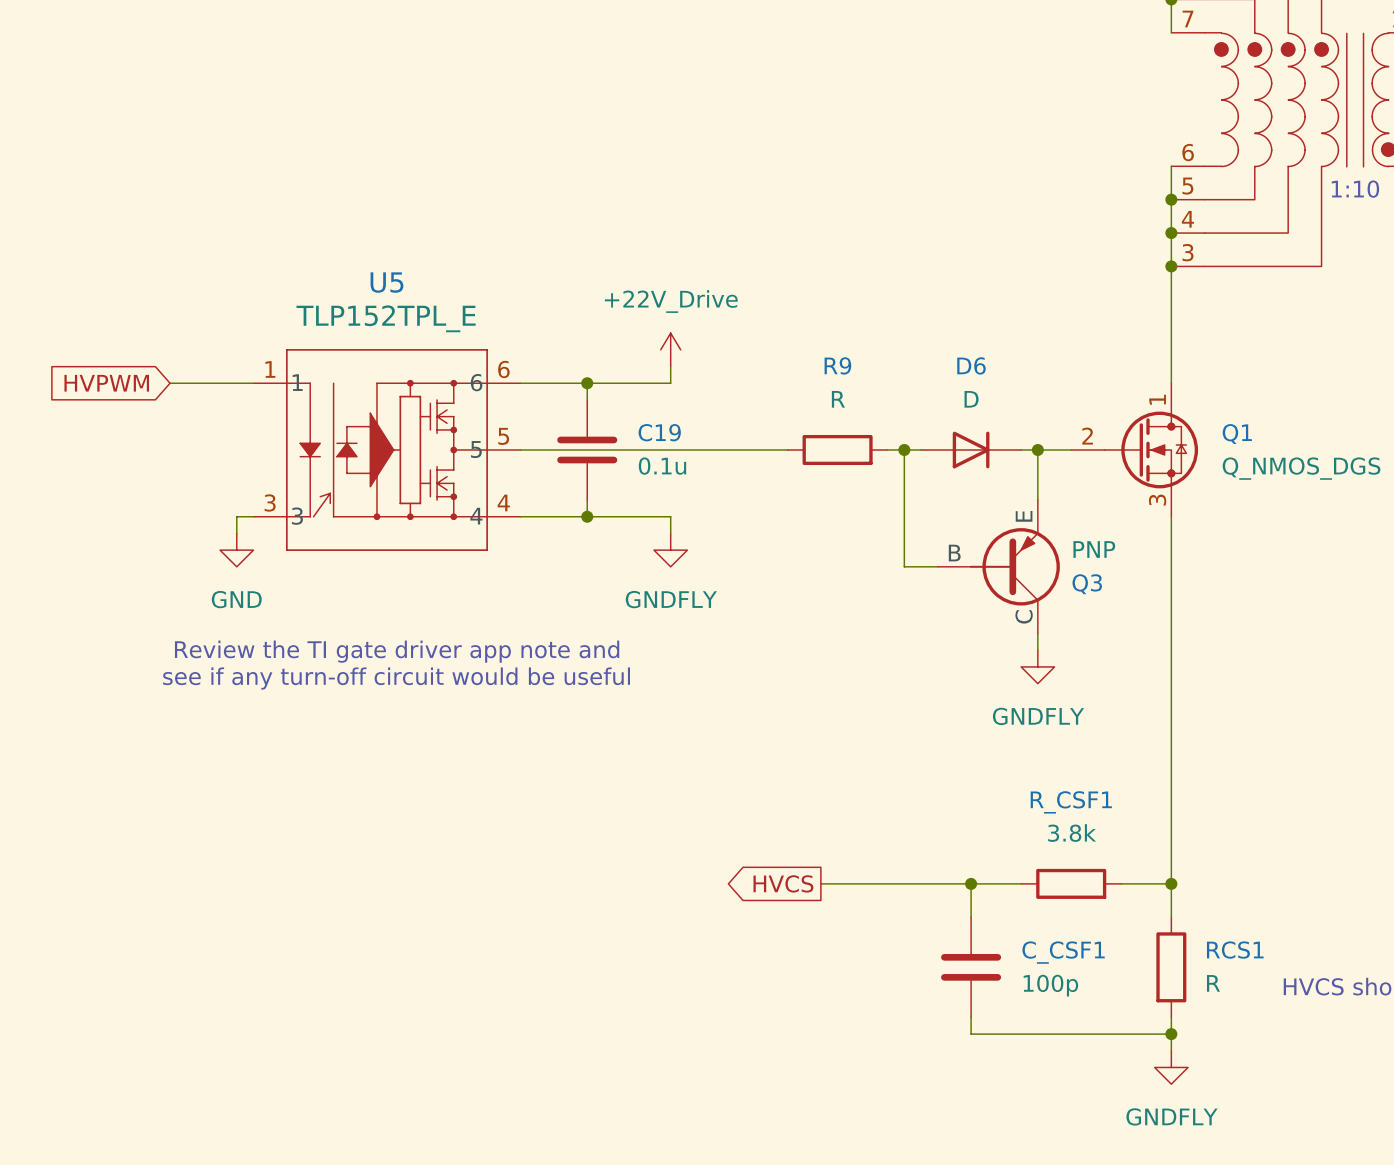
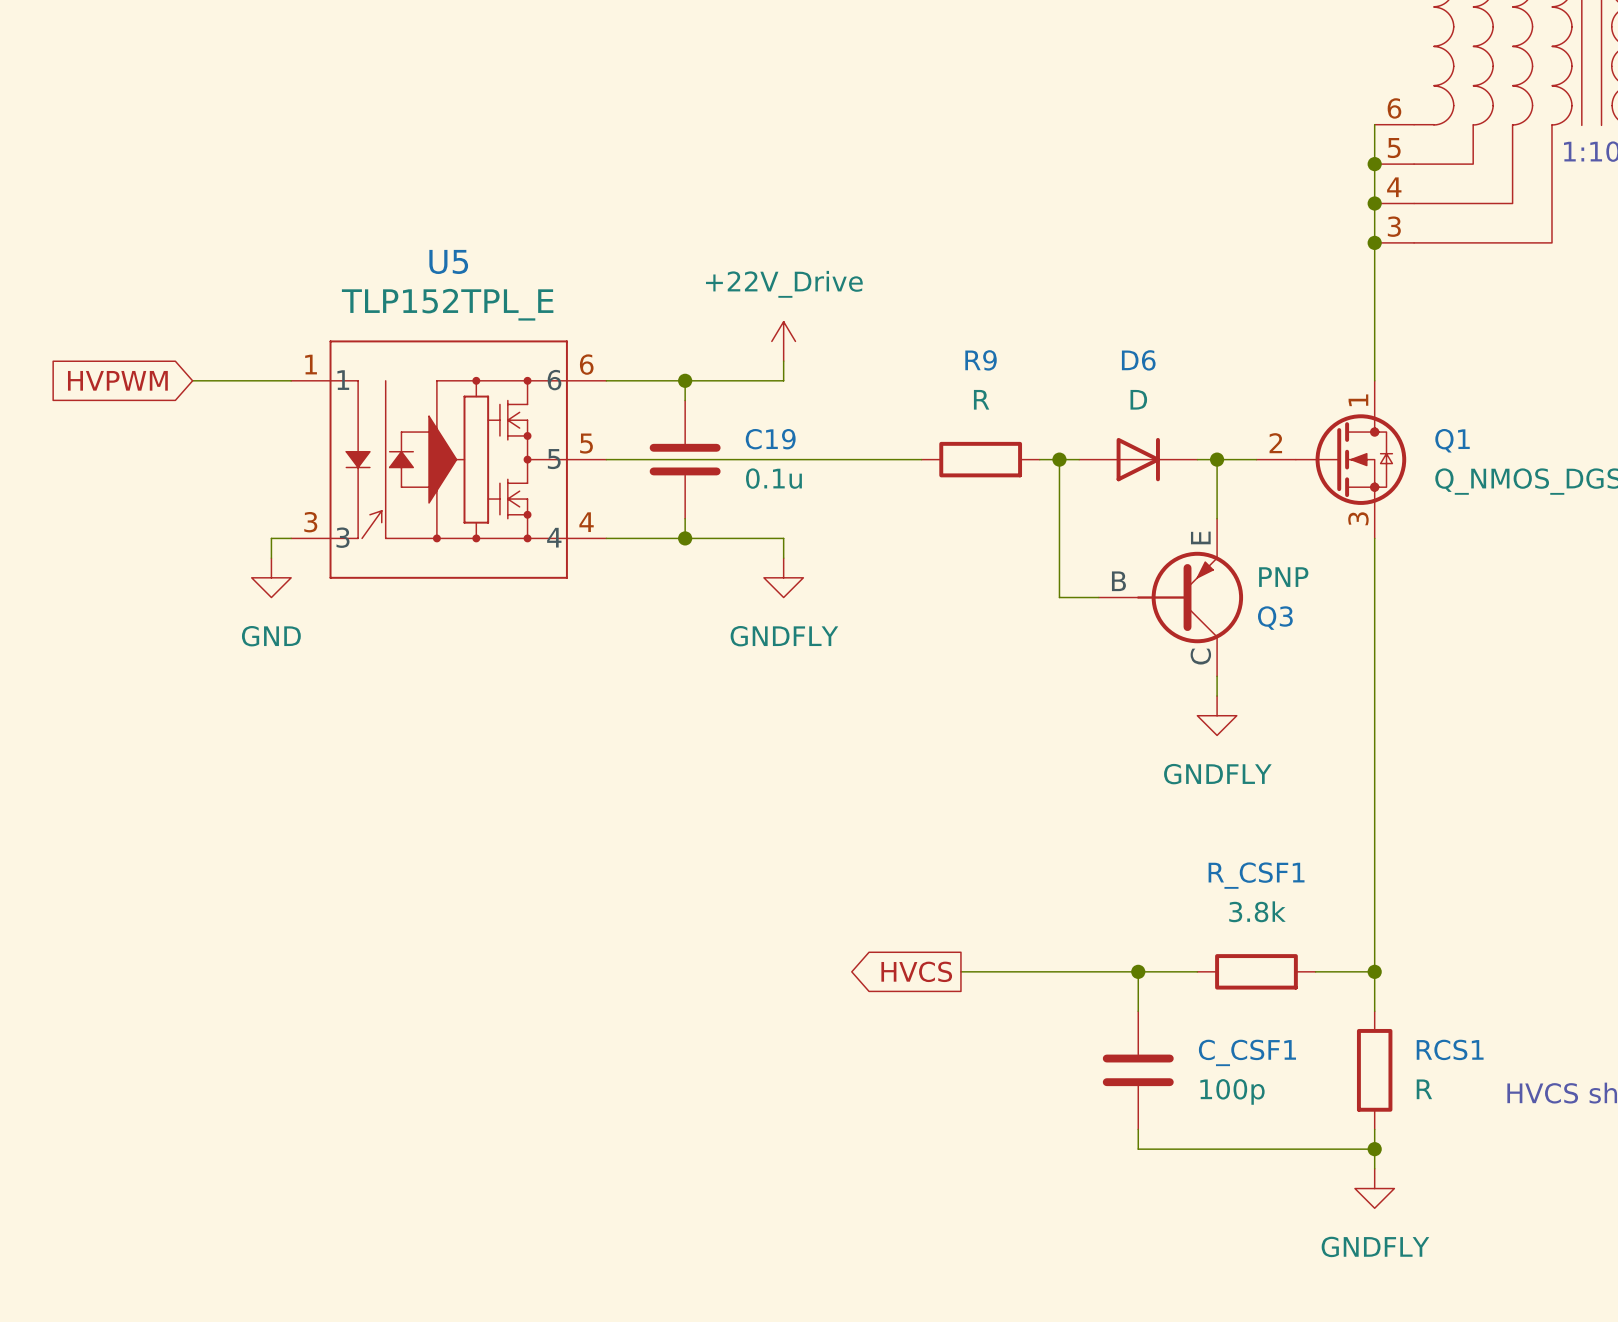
text: Review the TI gate driver app note and (397, 651) -> none
text: see if any turn-off circuit would be useful (396, 678) -> none

